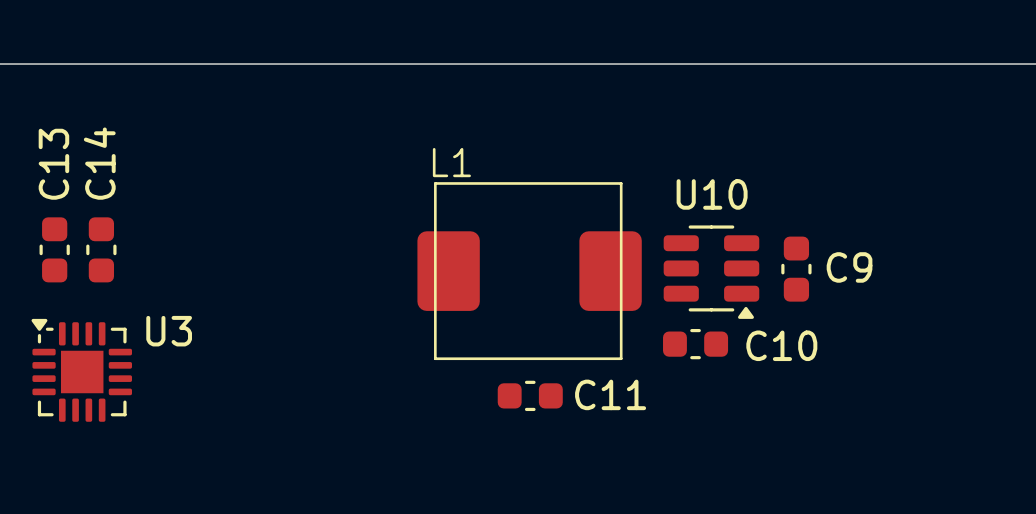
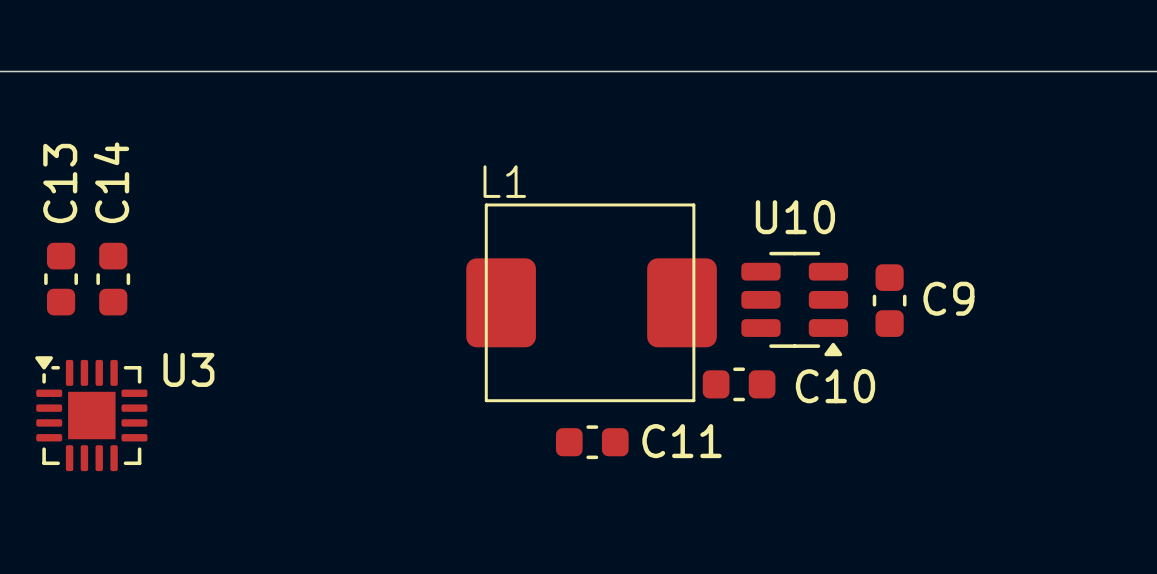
C10 position: (695, 344) -> (739, 384)

